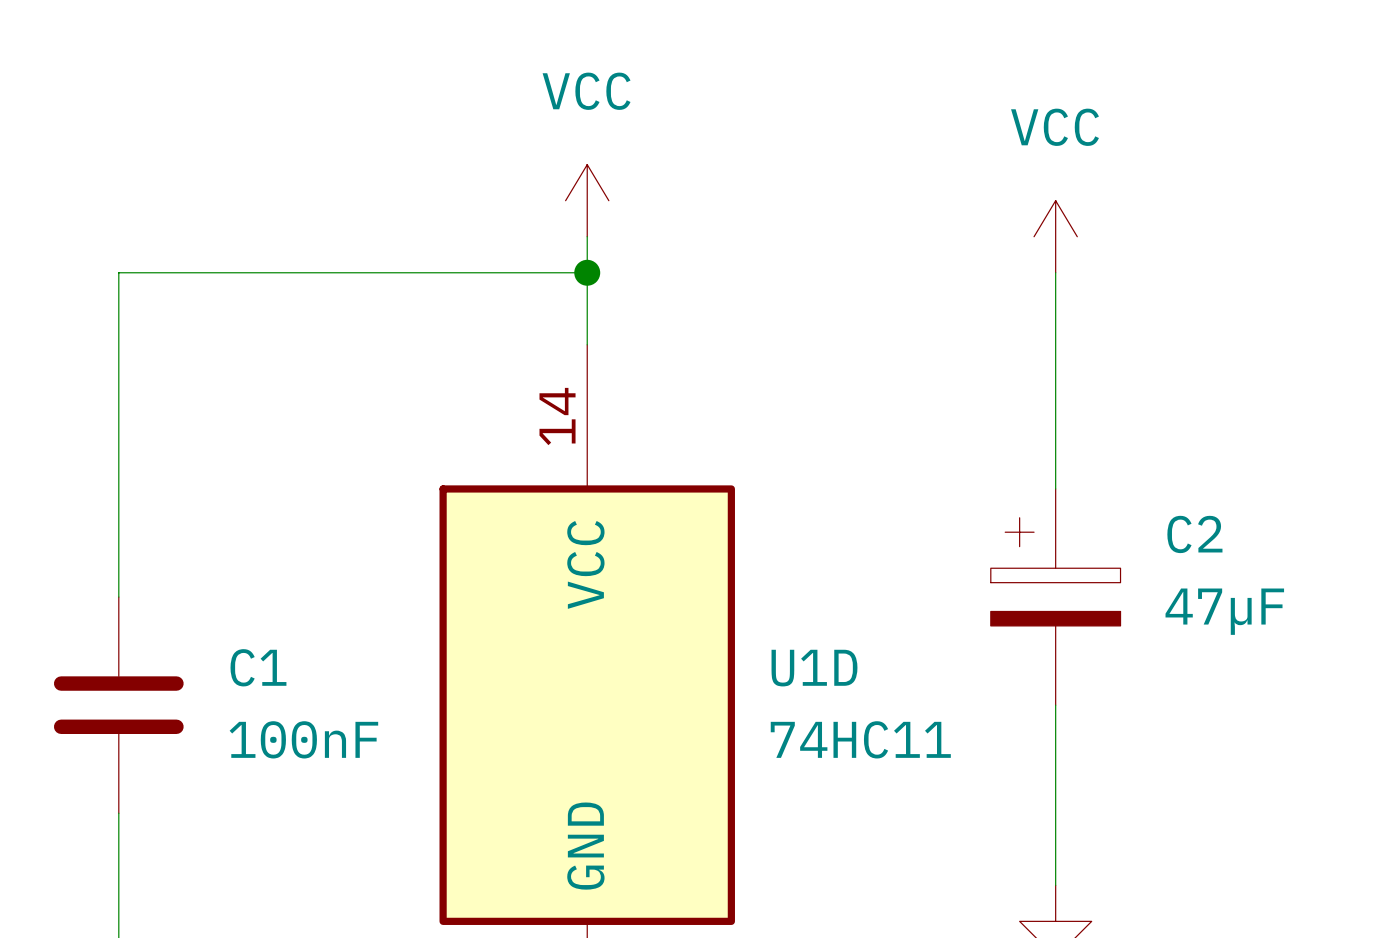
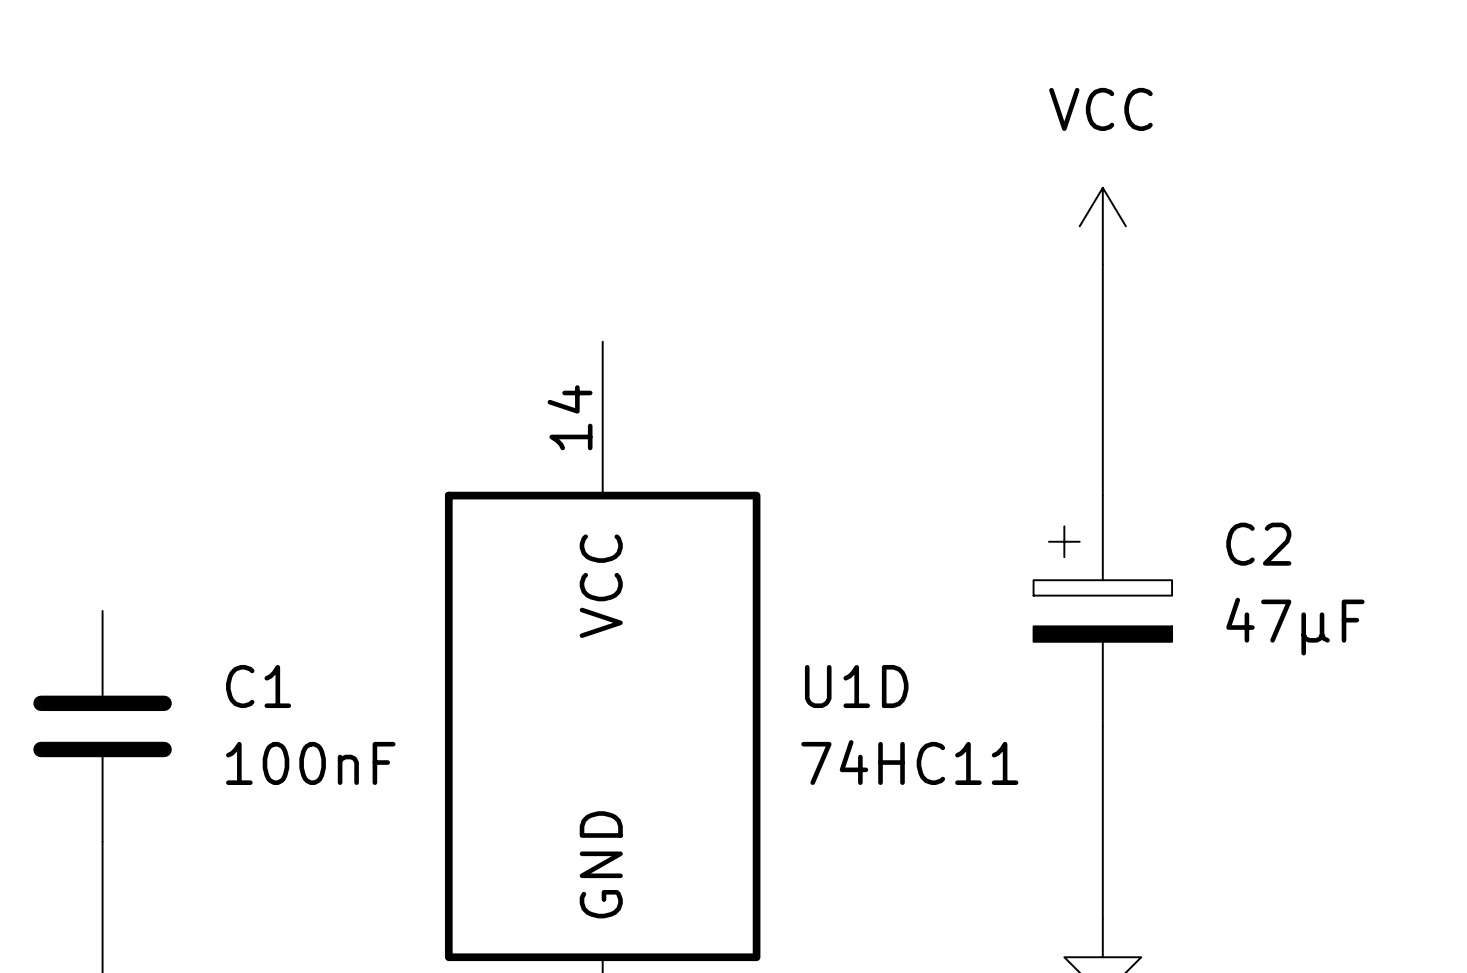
power symbol: VCC (587, 200) -> none
wire: (587, 236) (587, 344) -> none
wire: (587, 272) (118, 272) (118, 597) -> none
junction: (587, 272) -> none

